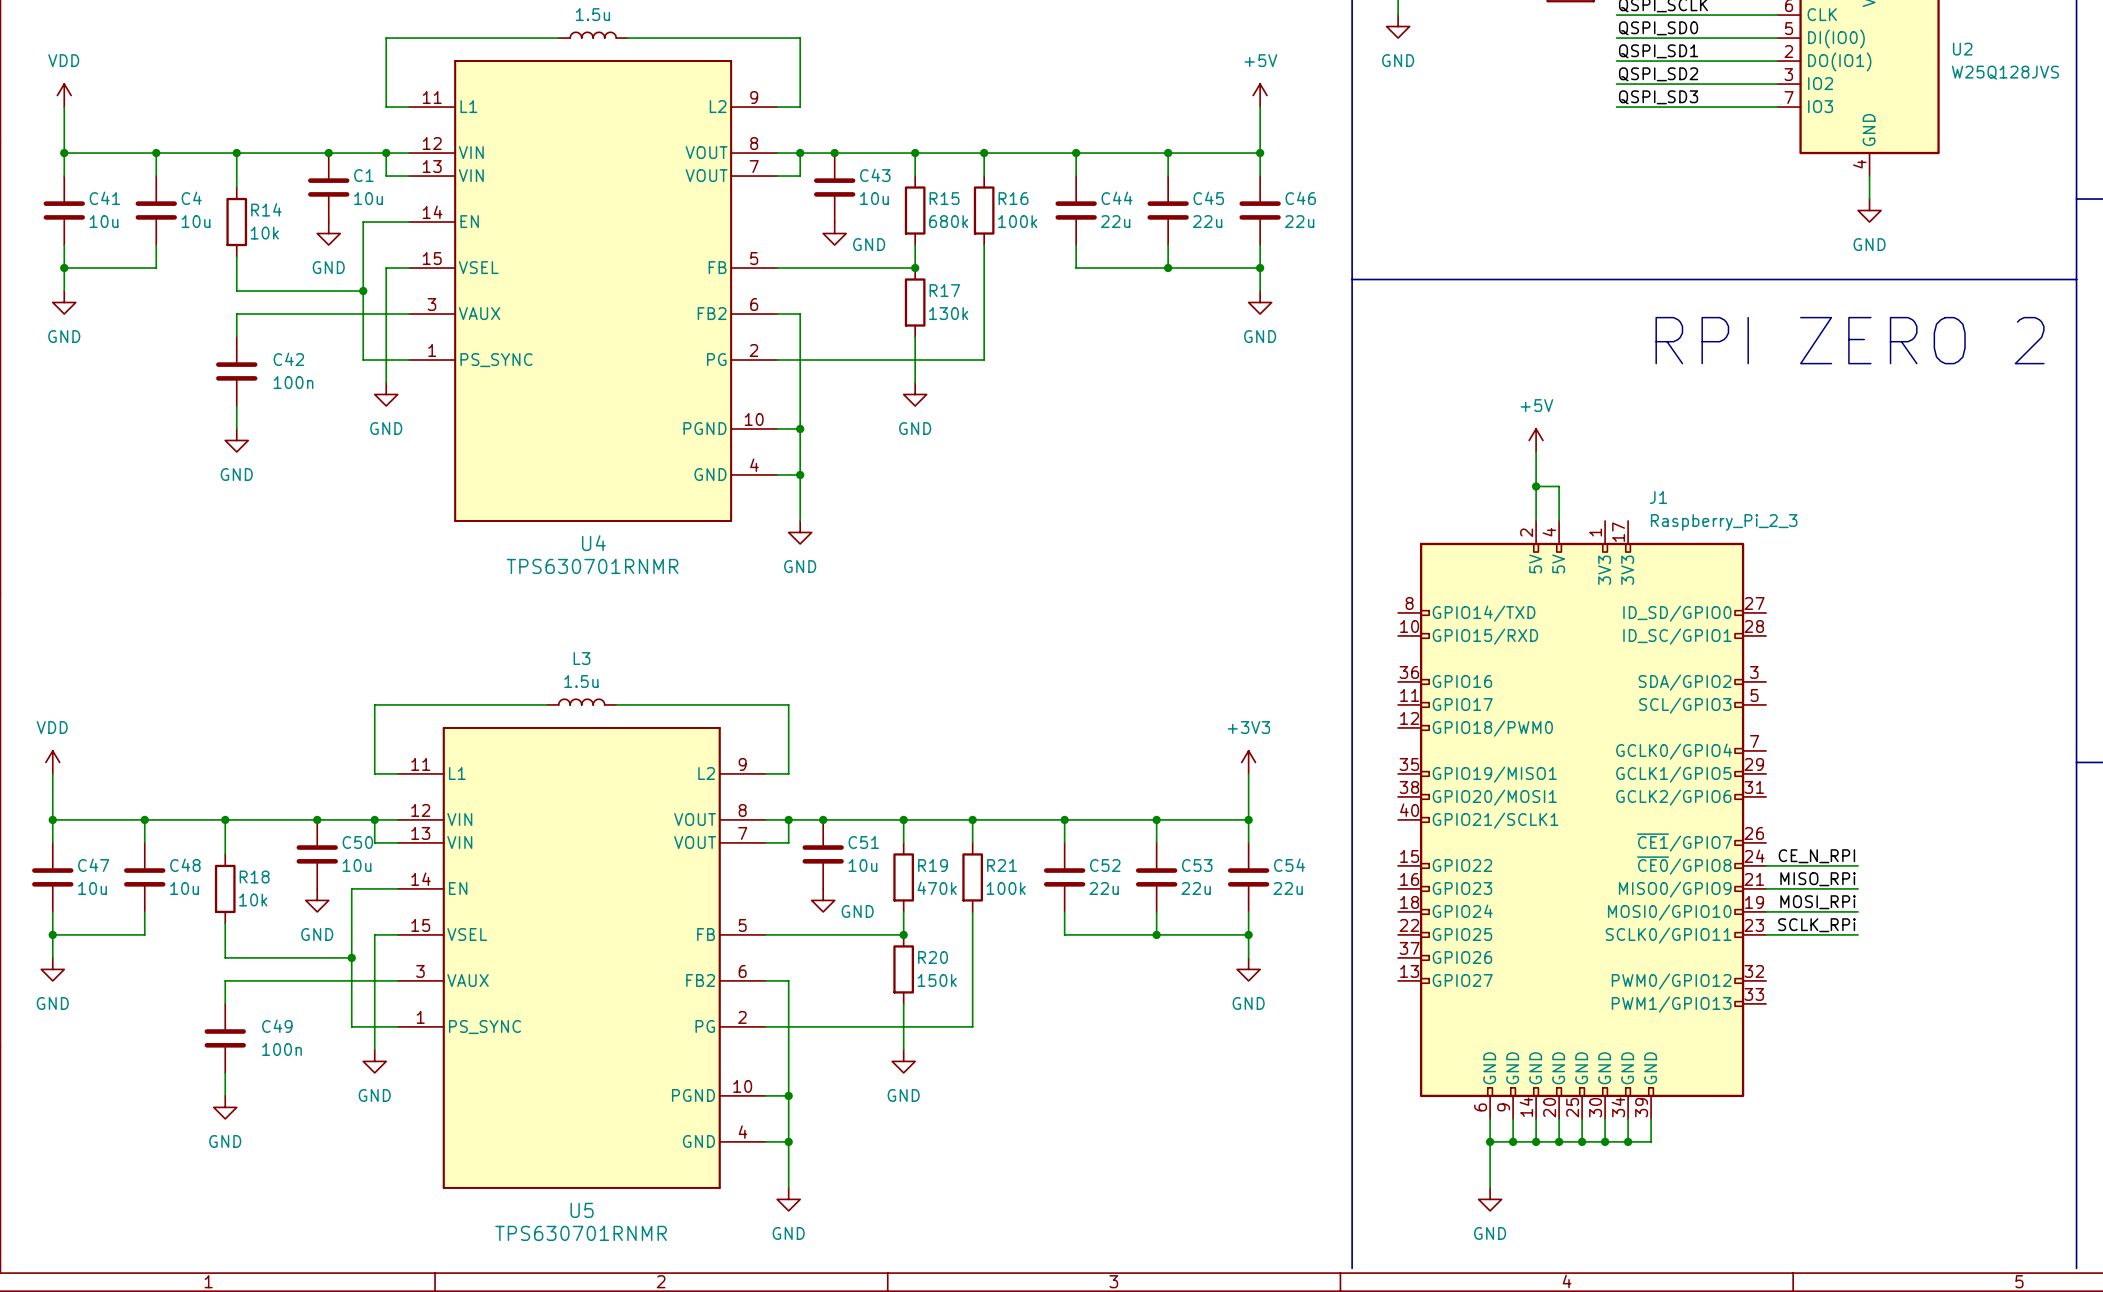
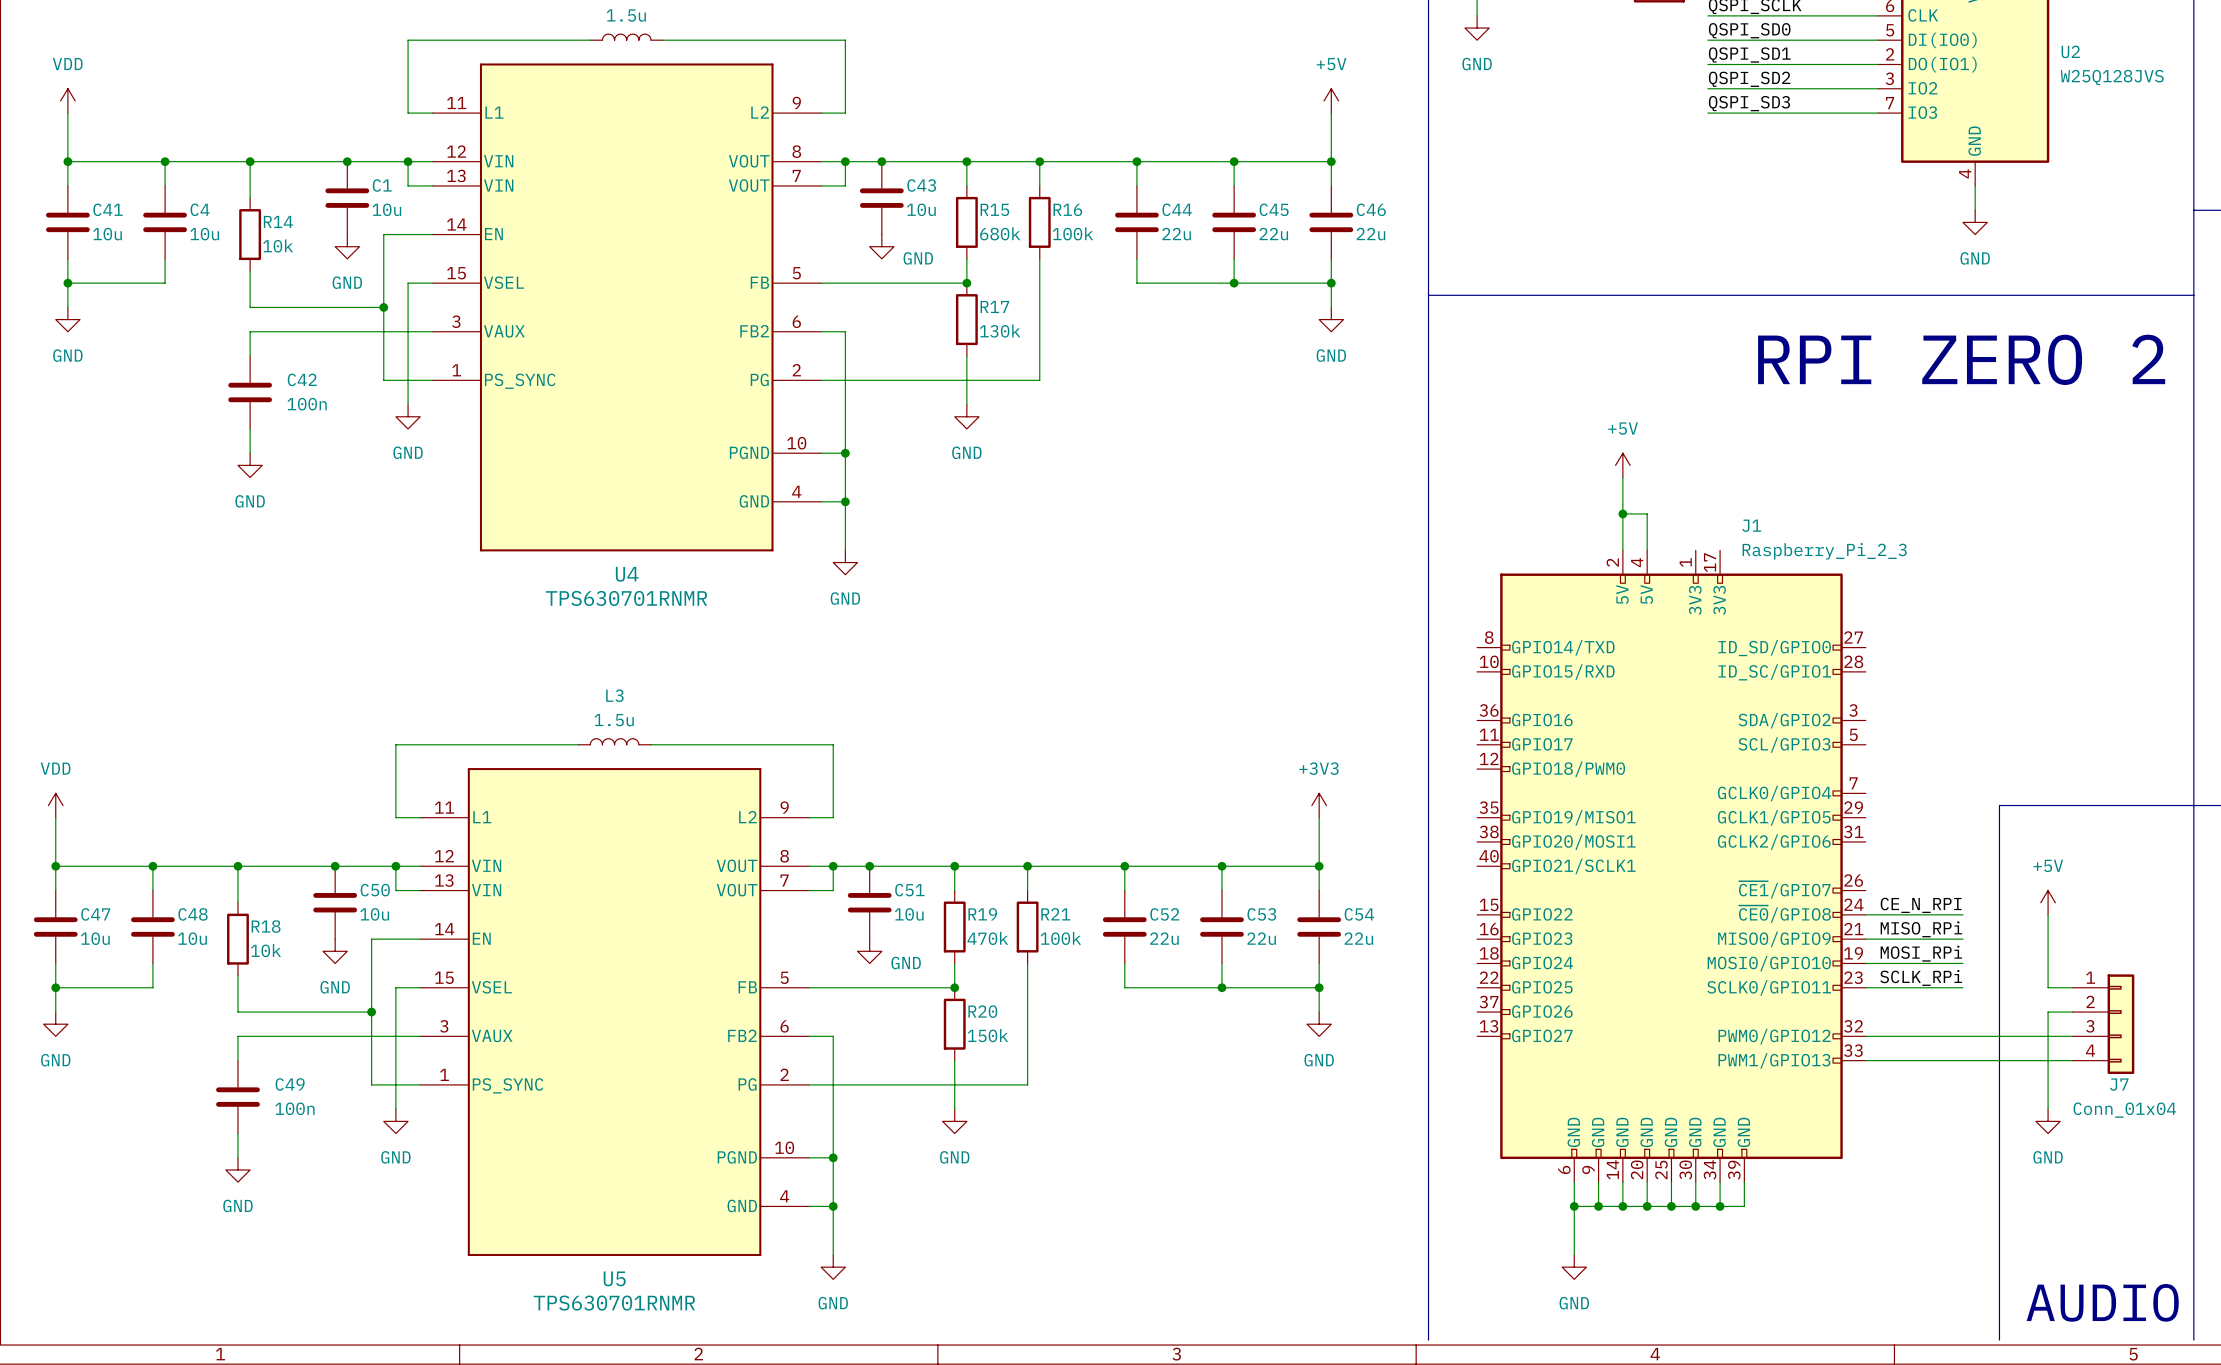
line: none -> (2193, 805) (1999, 805) (1999, 1340)
power symbol: none -> +5V (2048, 902)
wire: none -> (2048, 914) (2048, 987) (2072, 987)
wire: none -> (2072, 1012) (2048, 1012) (2048, 1109)
J7: none -> Conn_01x04 (2103, 1024)
wire: none -> (1865, 1036) (2072, 1036)
wire: none -> (1865, 1060) (2072, 1060)
power symbol: none -> GND (2048, 1121)
text: none -> AUDIO (2102, 1302)

